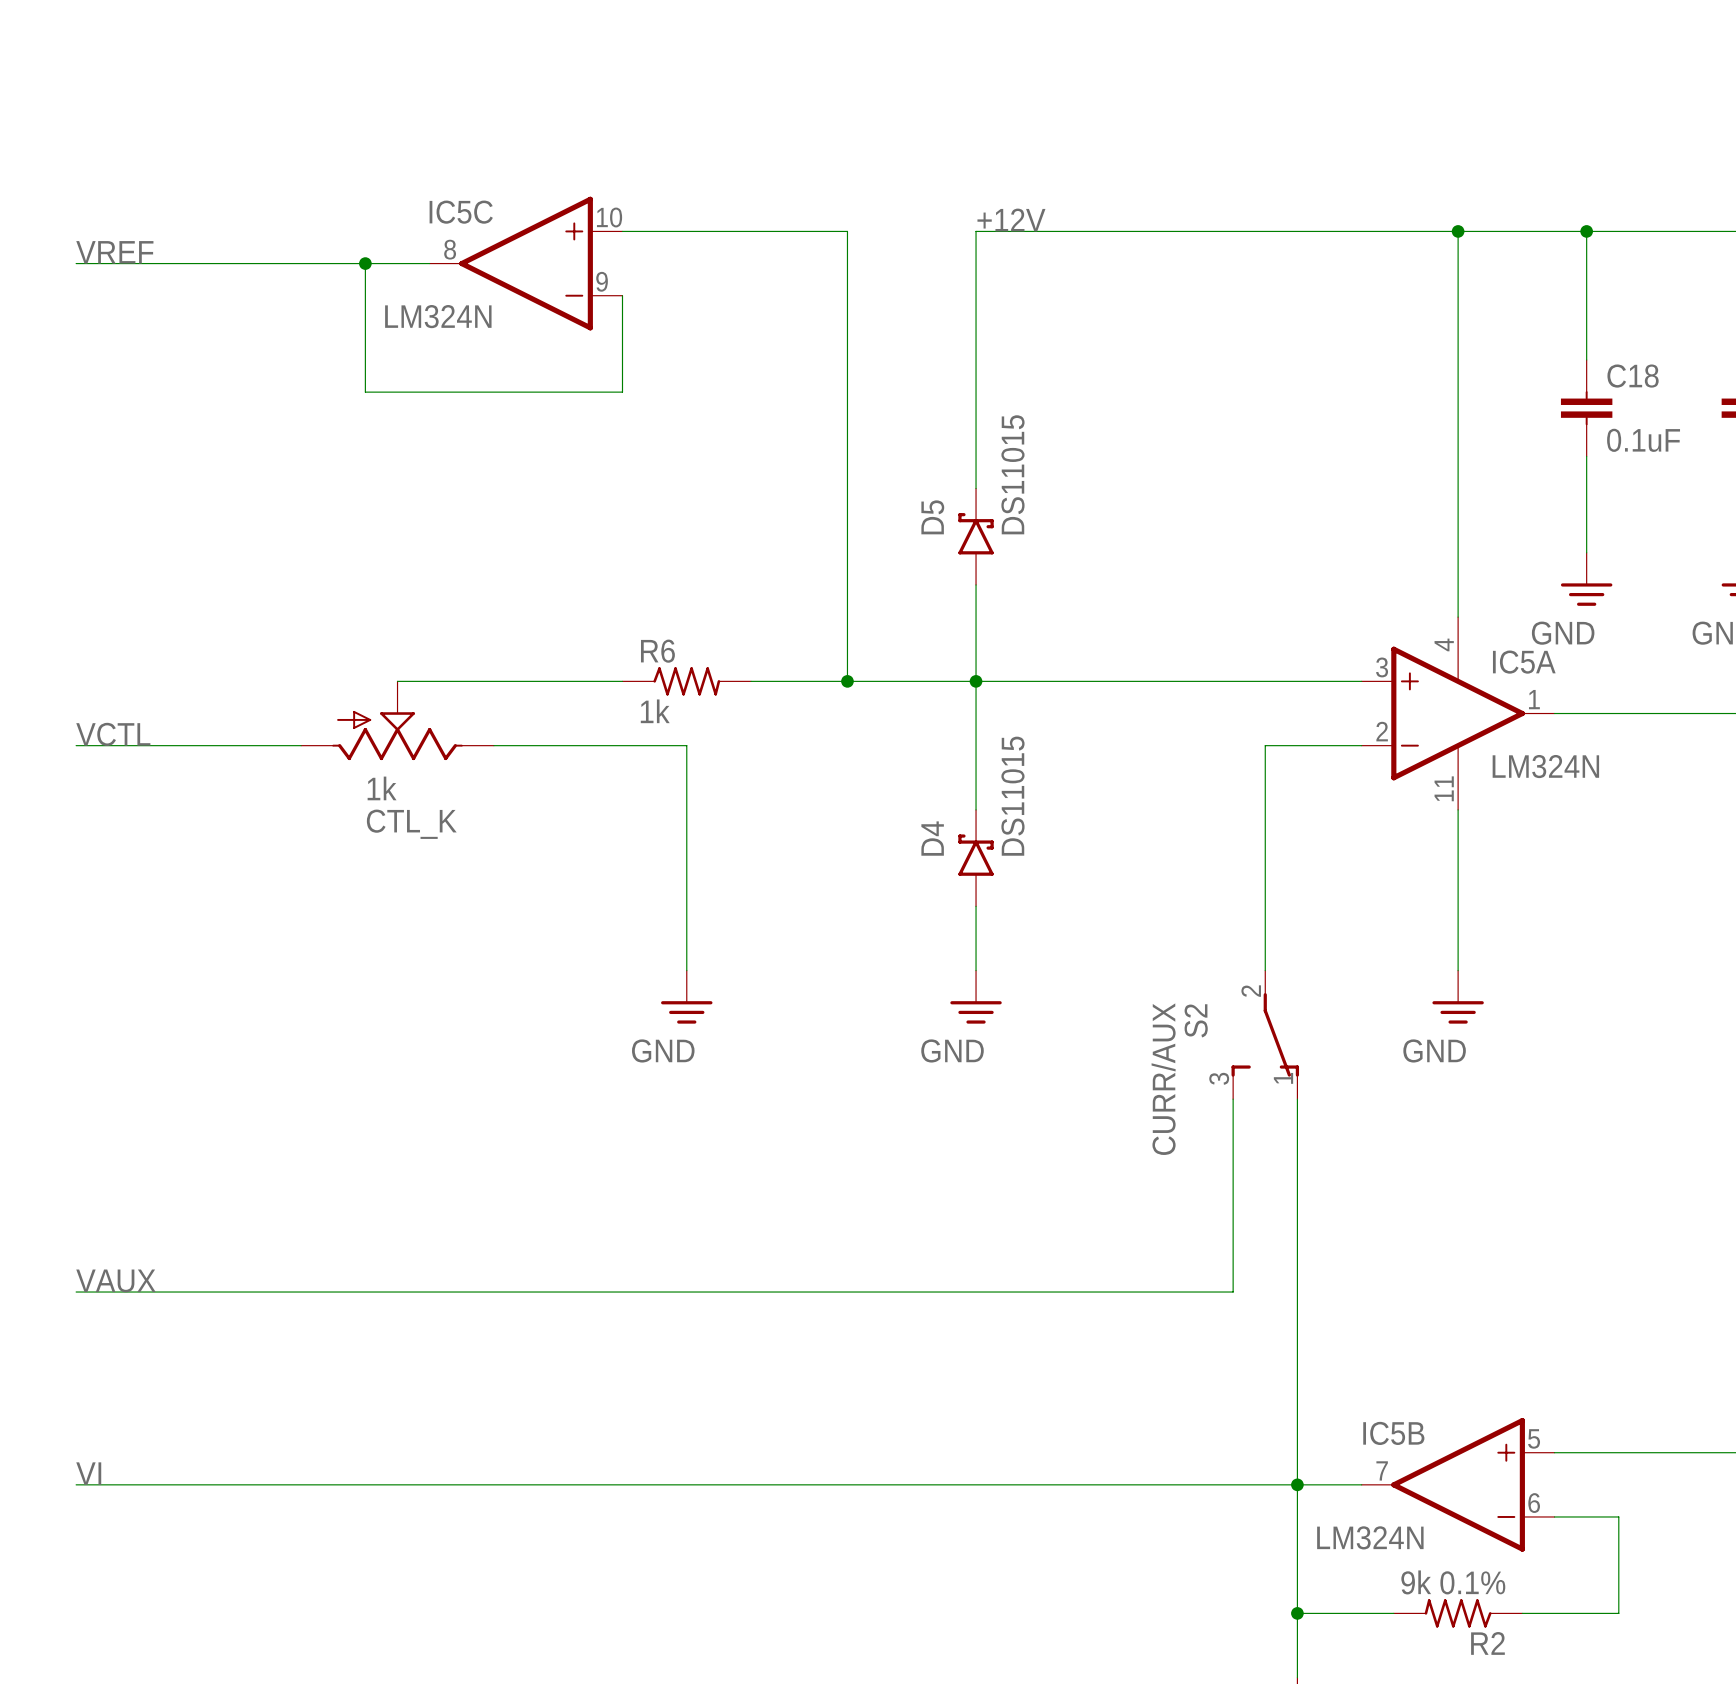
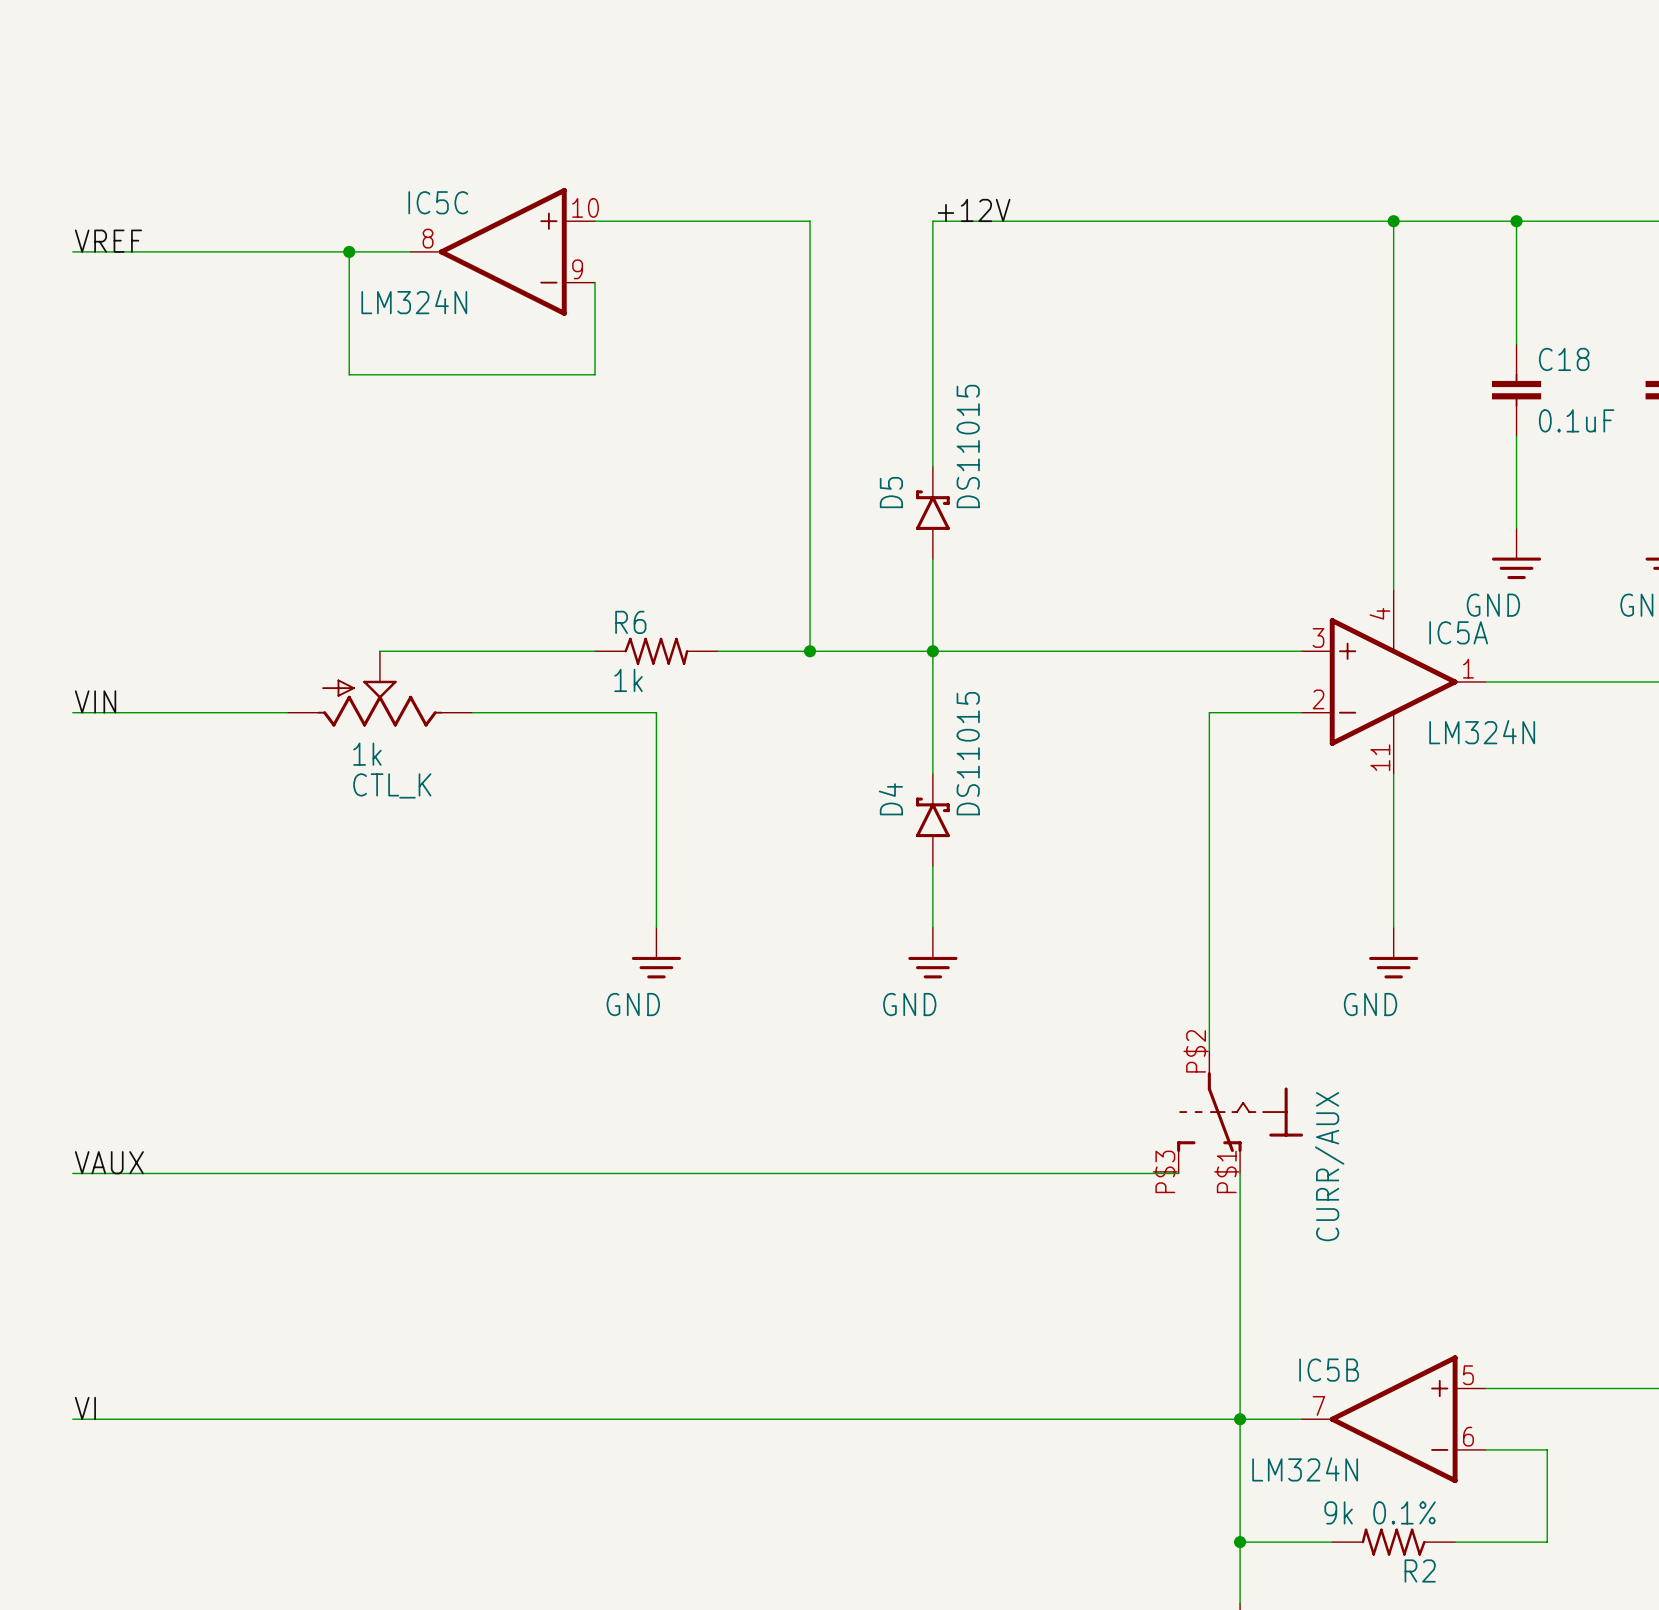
label: VCTL (113, 734) -> VIN (95, 701)
S2: CURR/AUX (1265, 1034) -> none
wire: (1233, 1099) (1233, 1292) (76, 1292) -> none
wire: (1297, 1099) (1297, 1227) -> (1209, 927) (1209, 1050)
CURR/AUX: none -> (1240, 1112)
wire: none -> (72, 1173) (1178, 1173)
label position: VAUX (115, 1280) -> VAUX (109, 1162)

